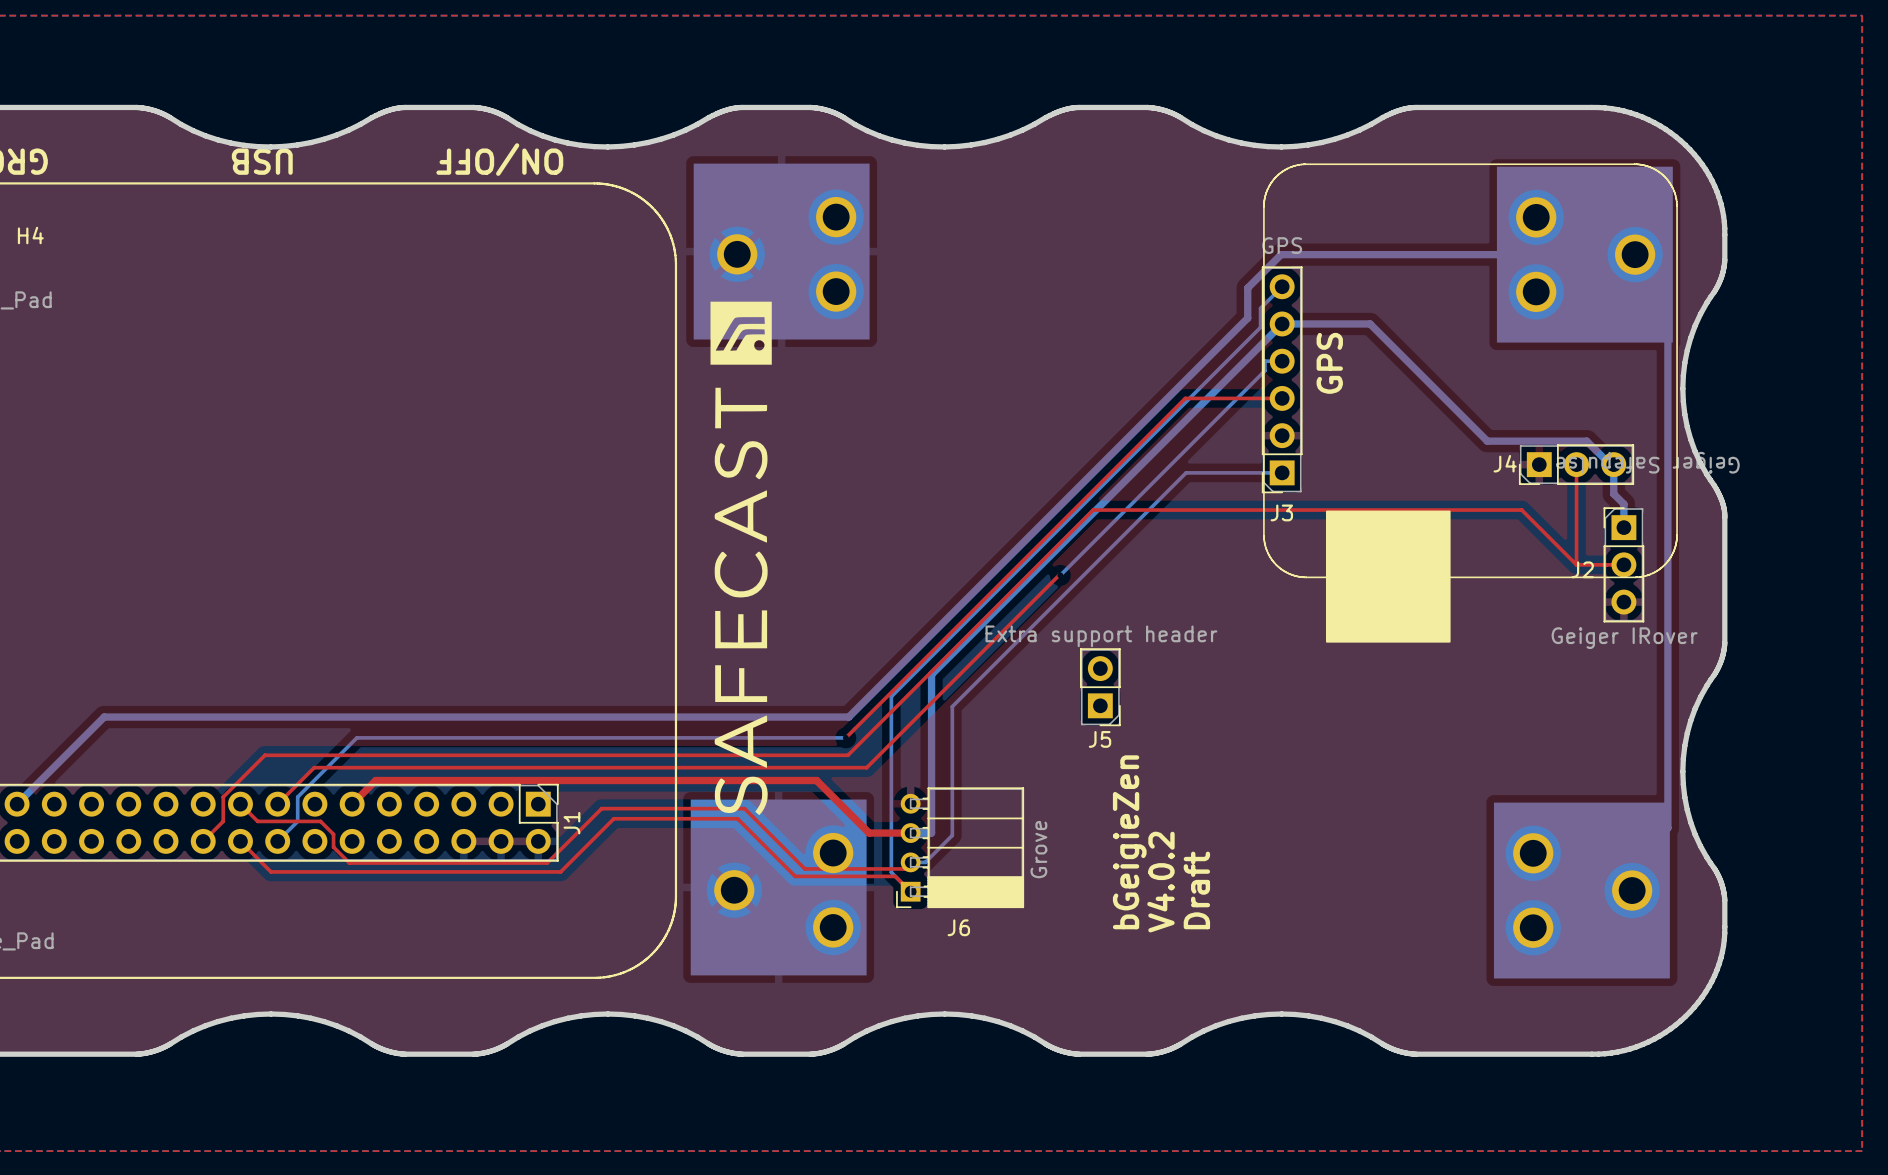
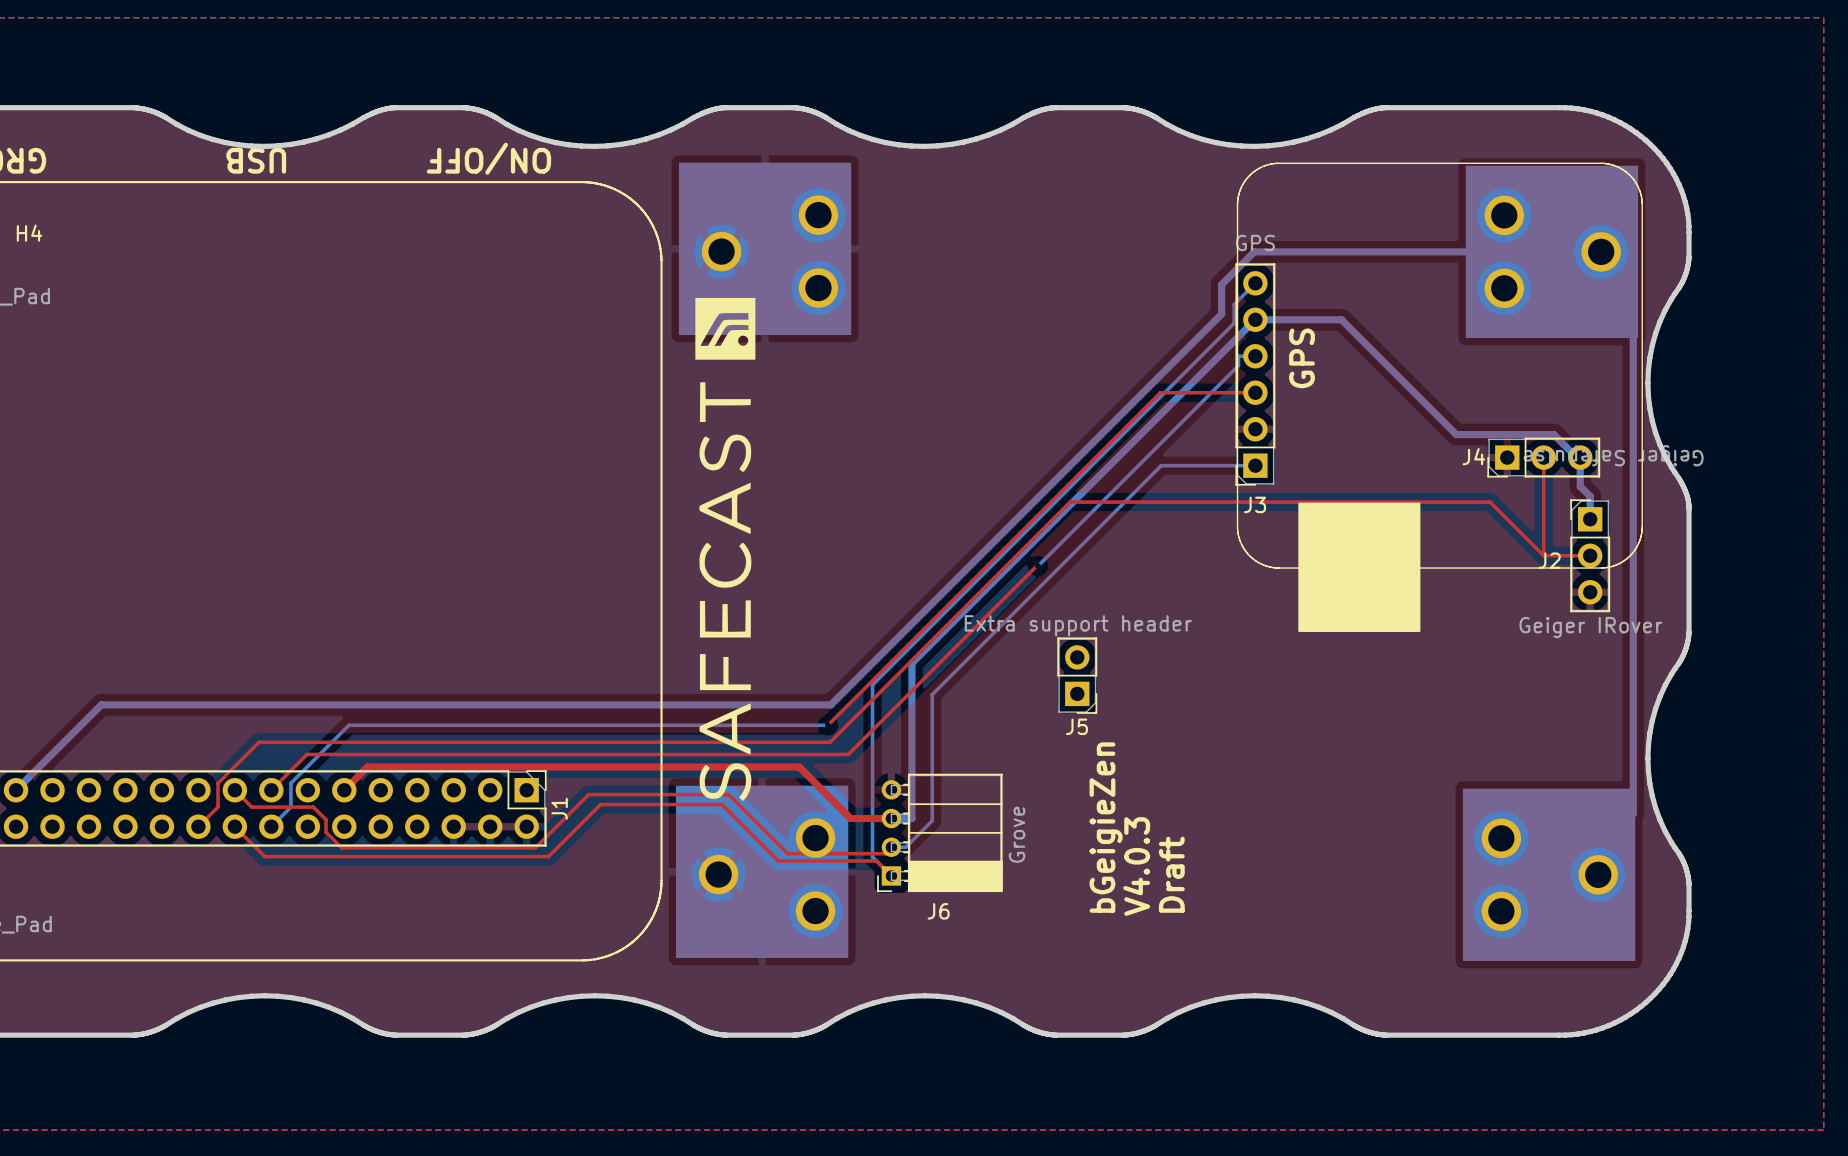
text: V4.0.2 (1160, 882) -> V4.0.3 (1136, 866)

